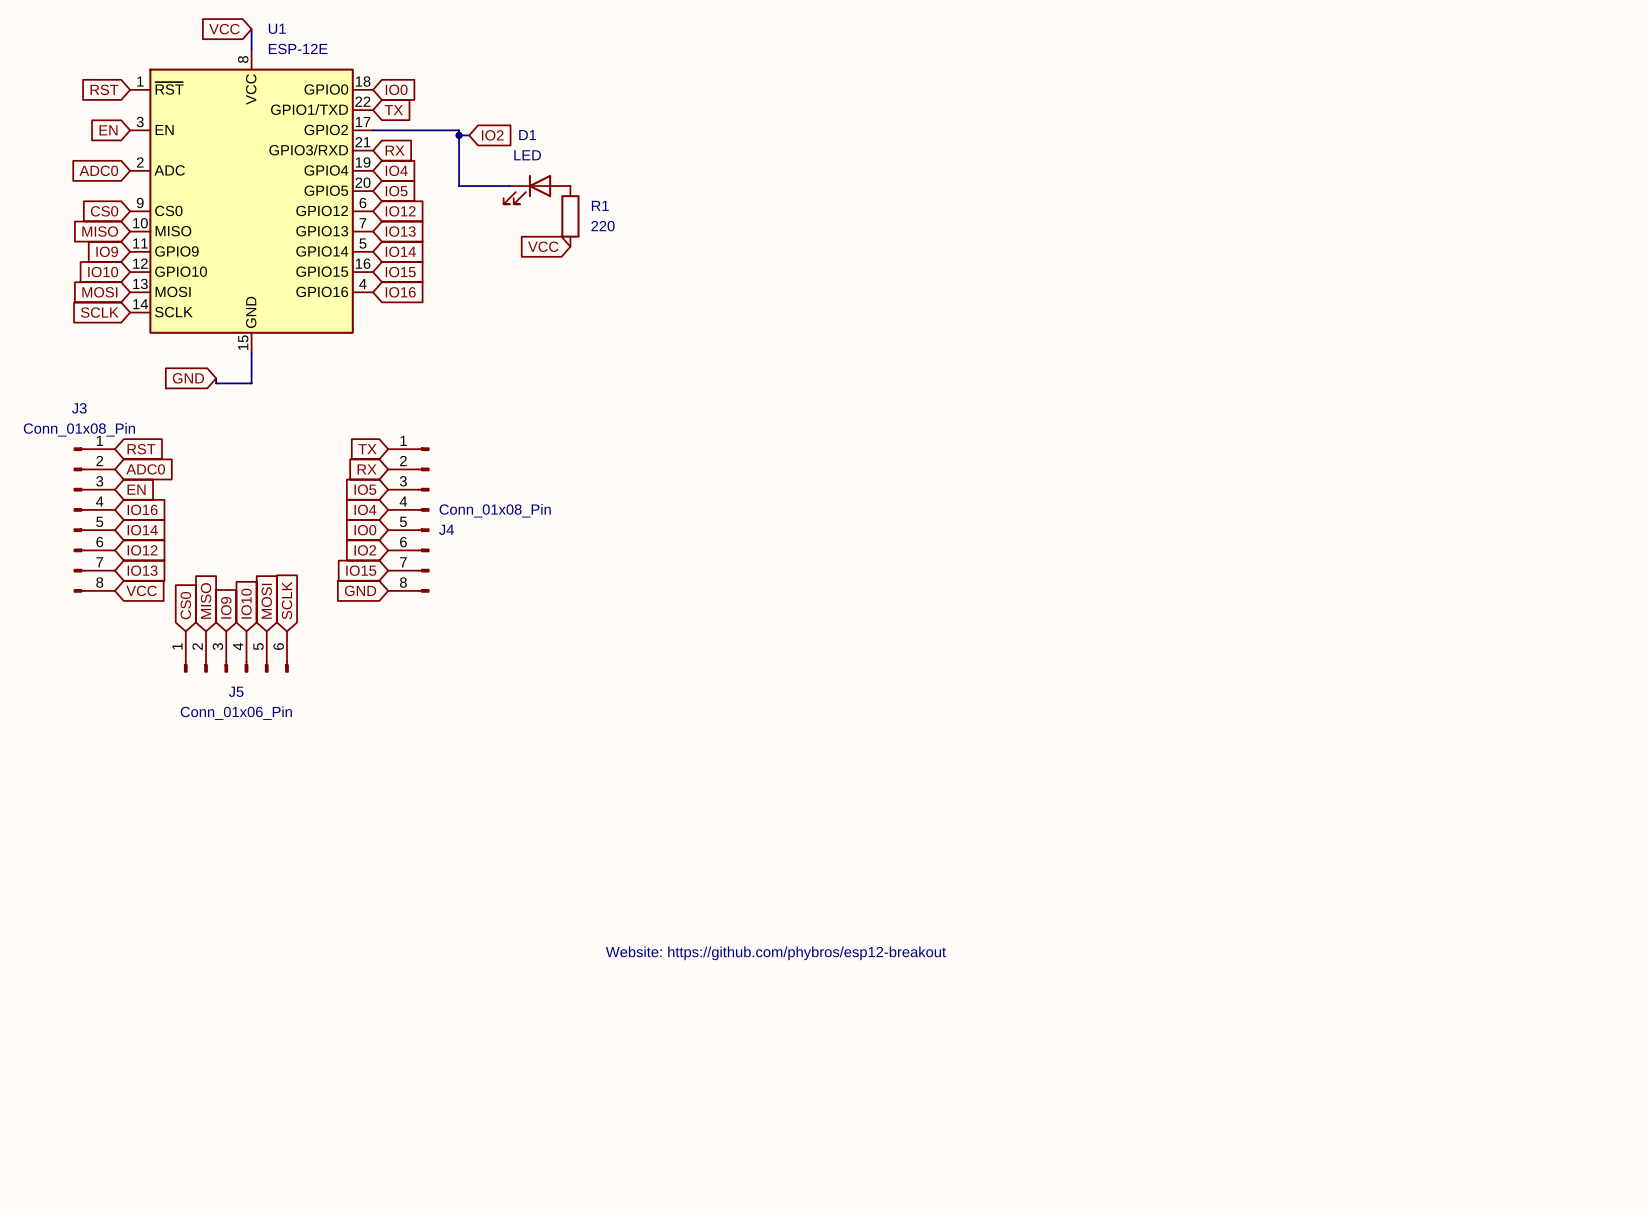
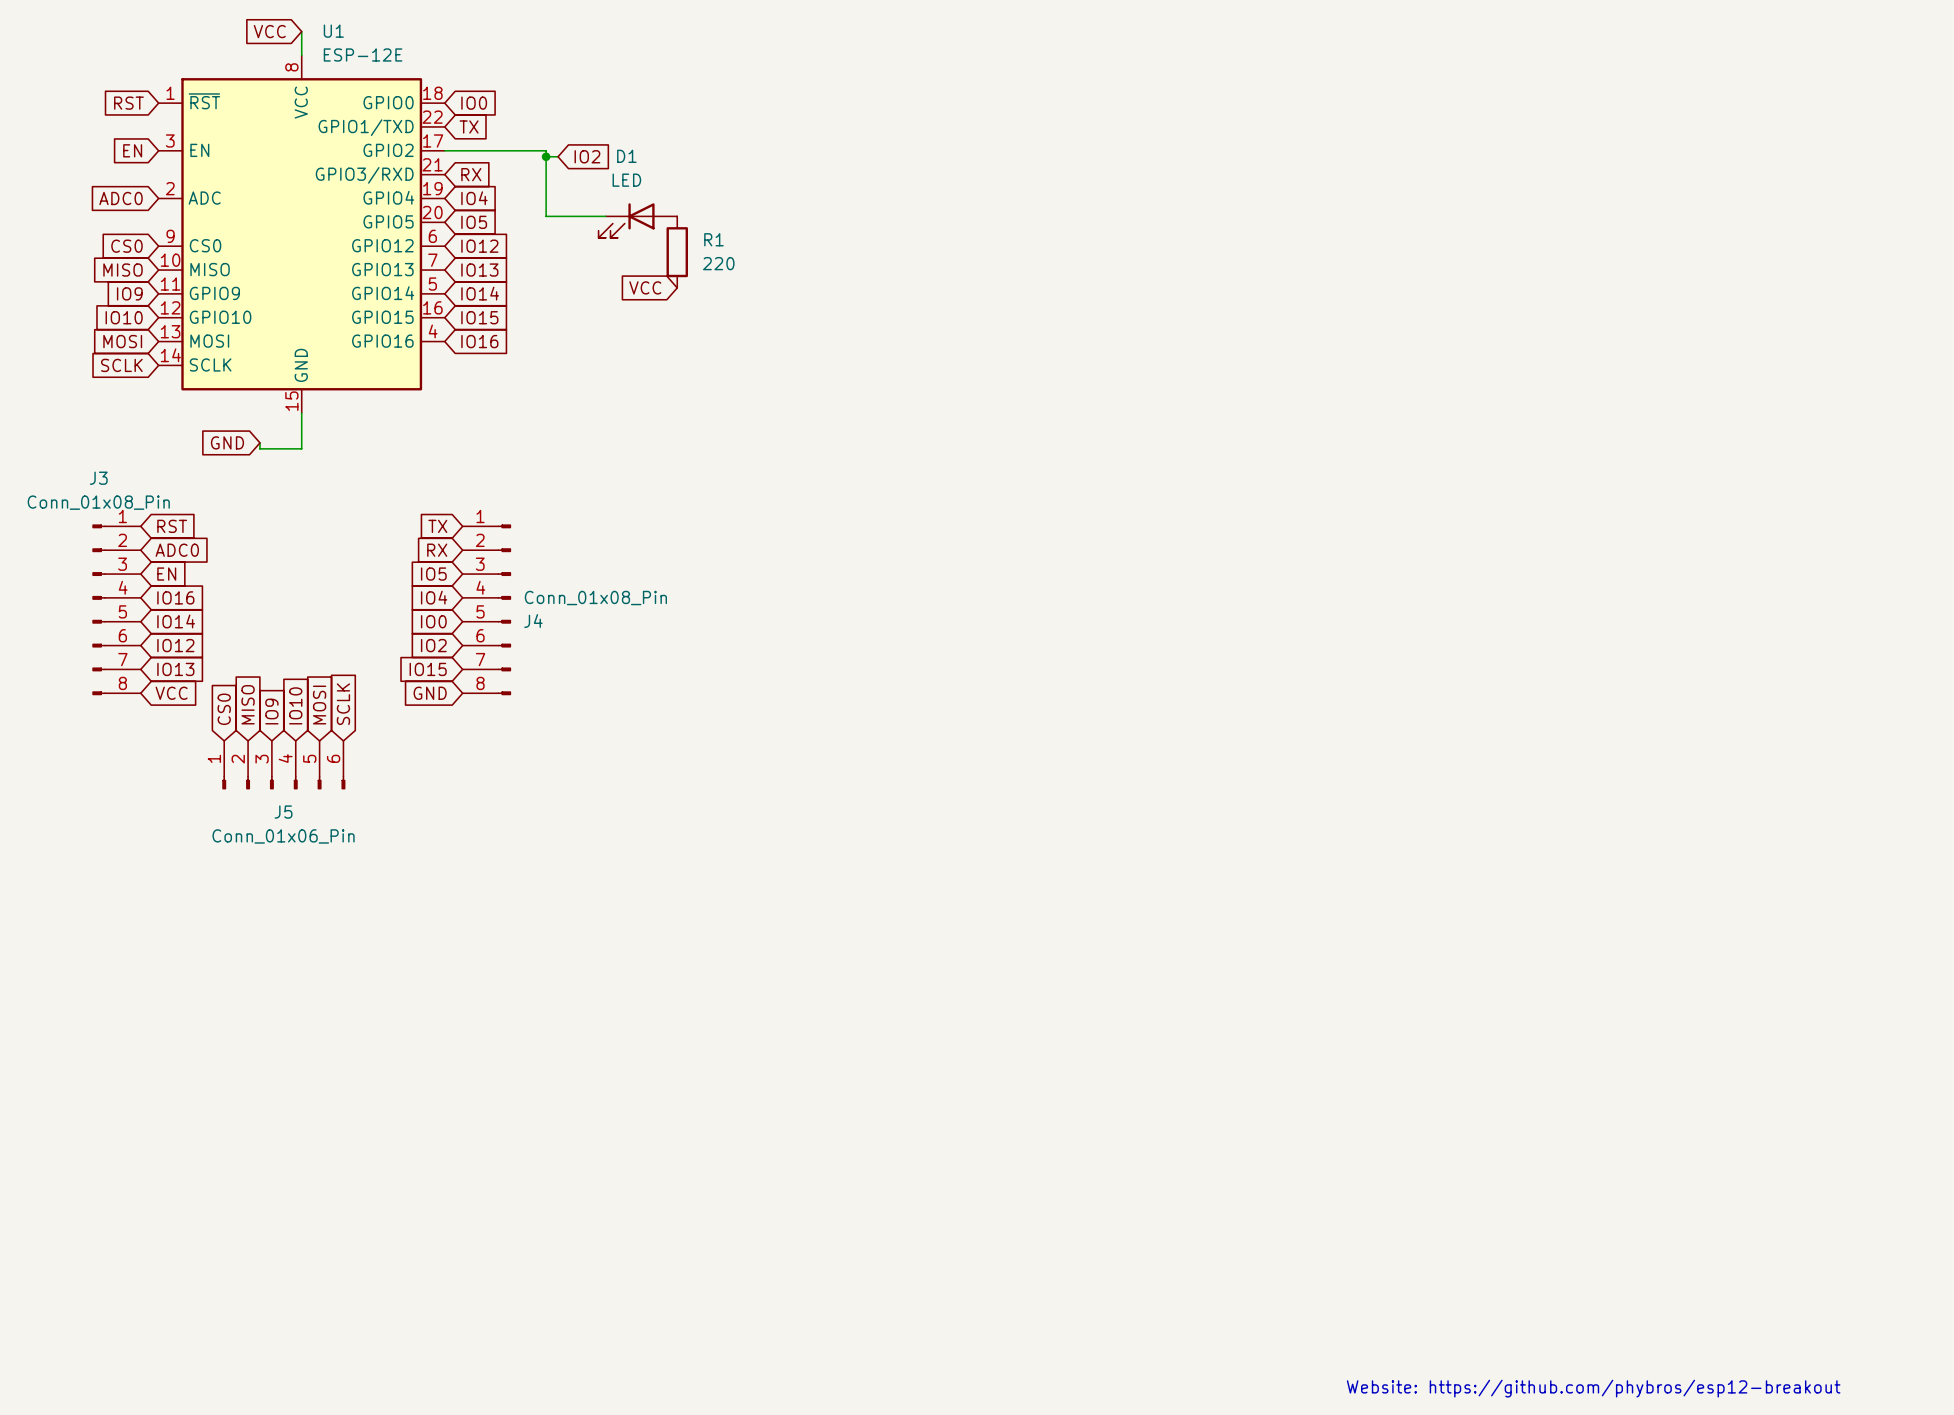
text: Website: https://github.com/phybros/esp12-breakout (775, 953) -> none
text: none -> Website: https://github.com/phybros/esp12-breakout (1593, 1388)

